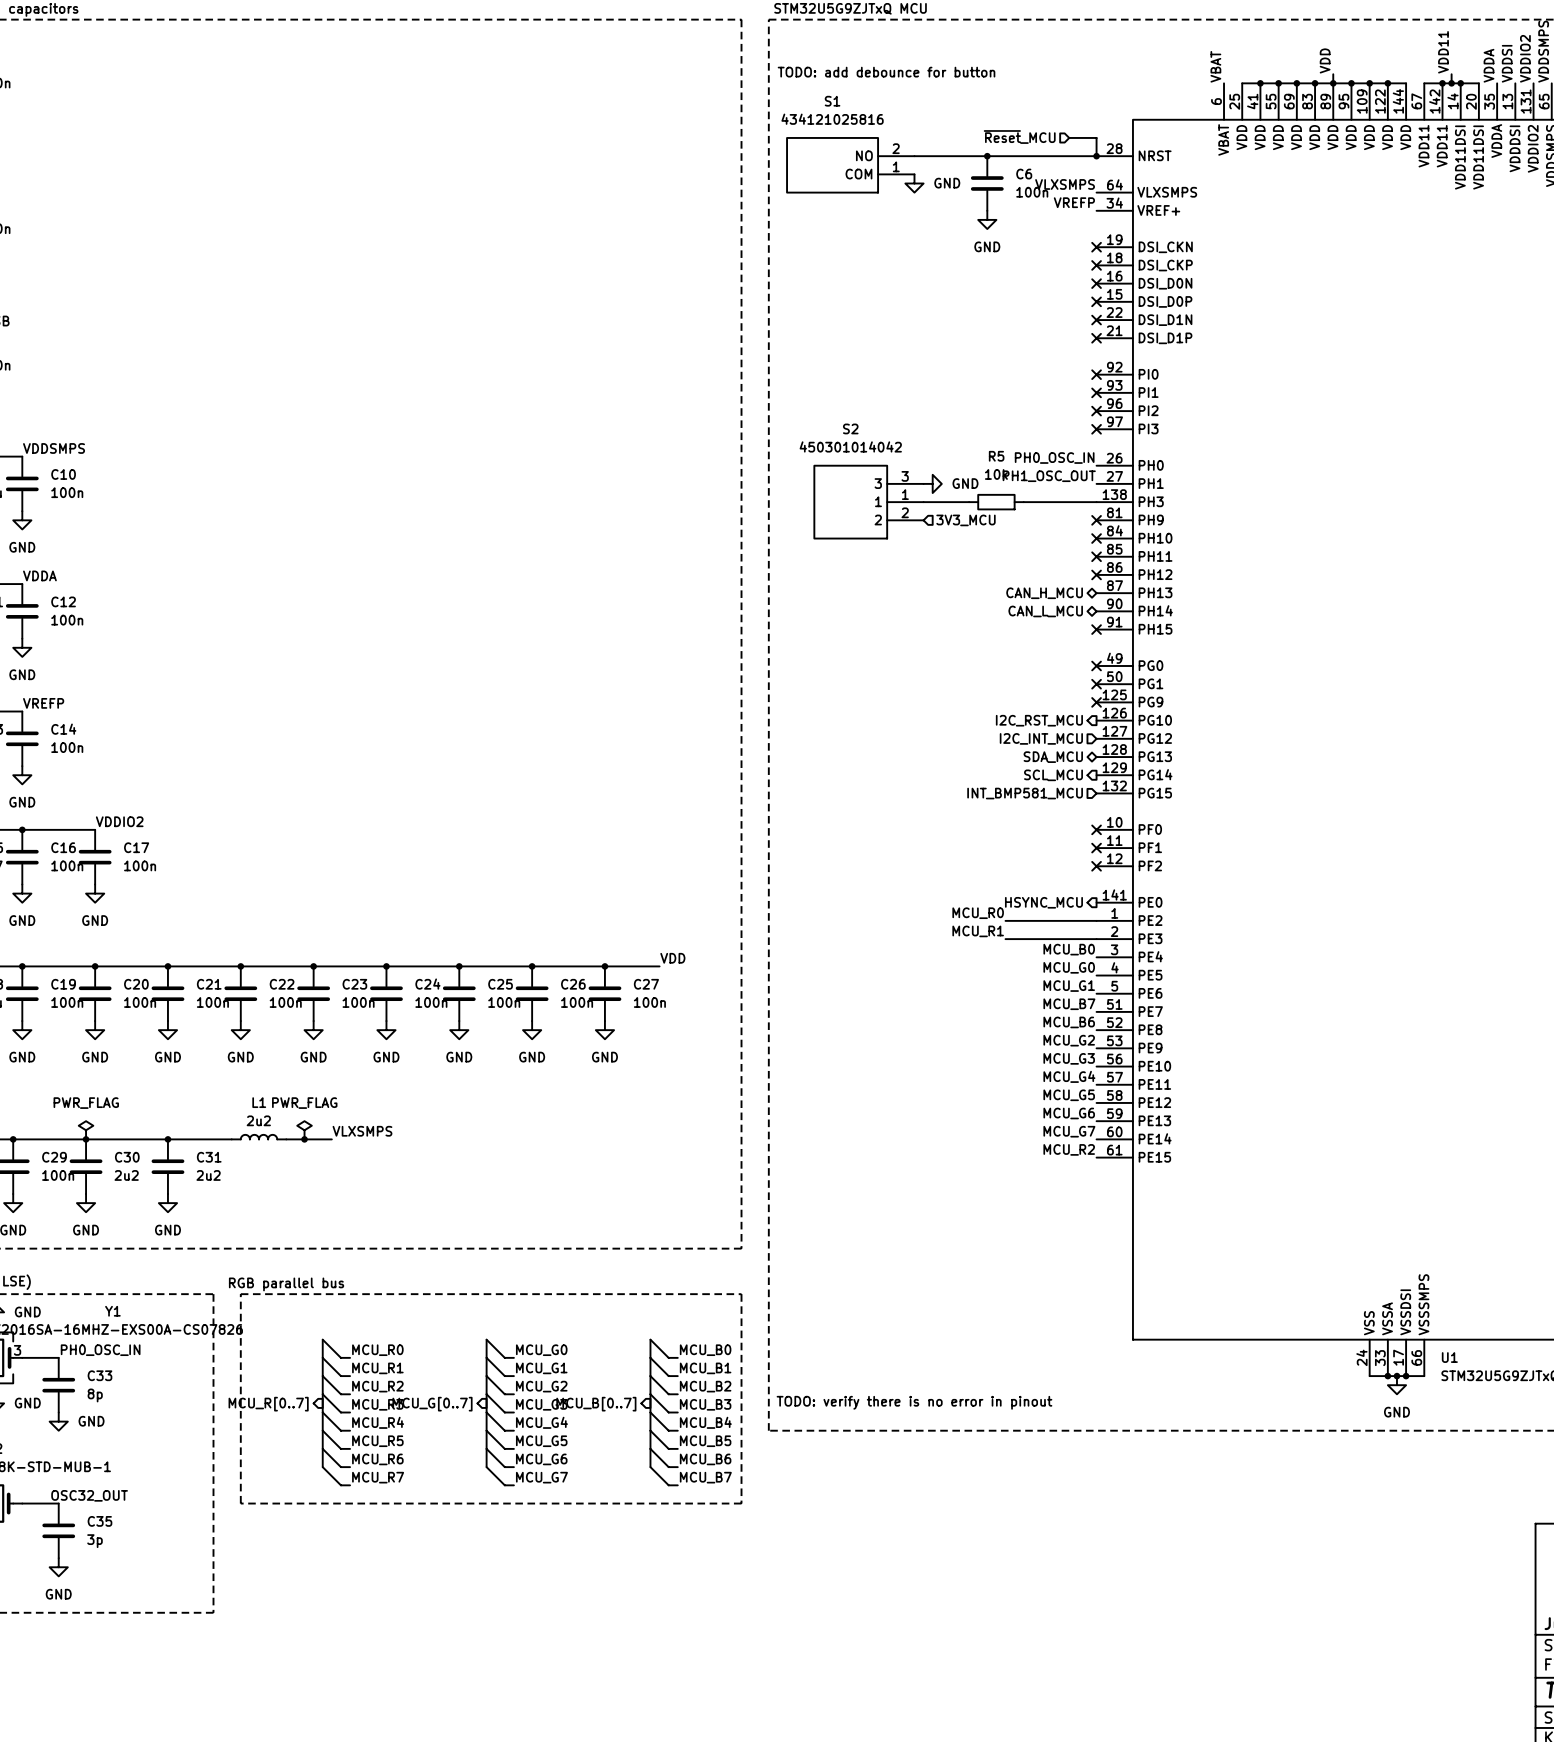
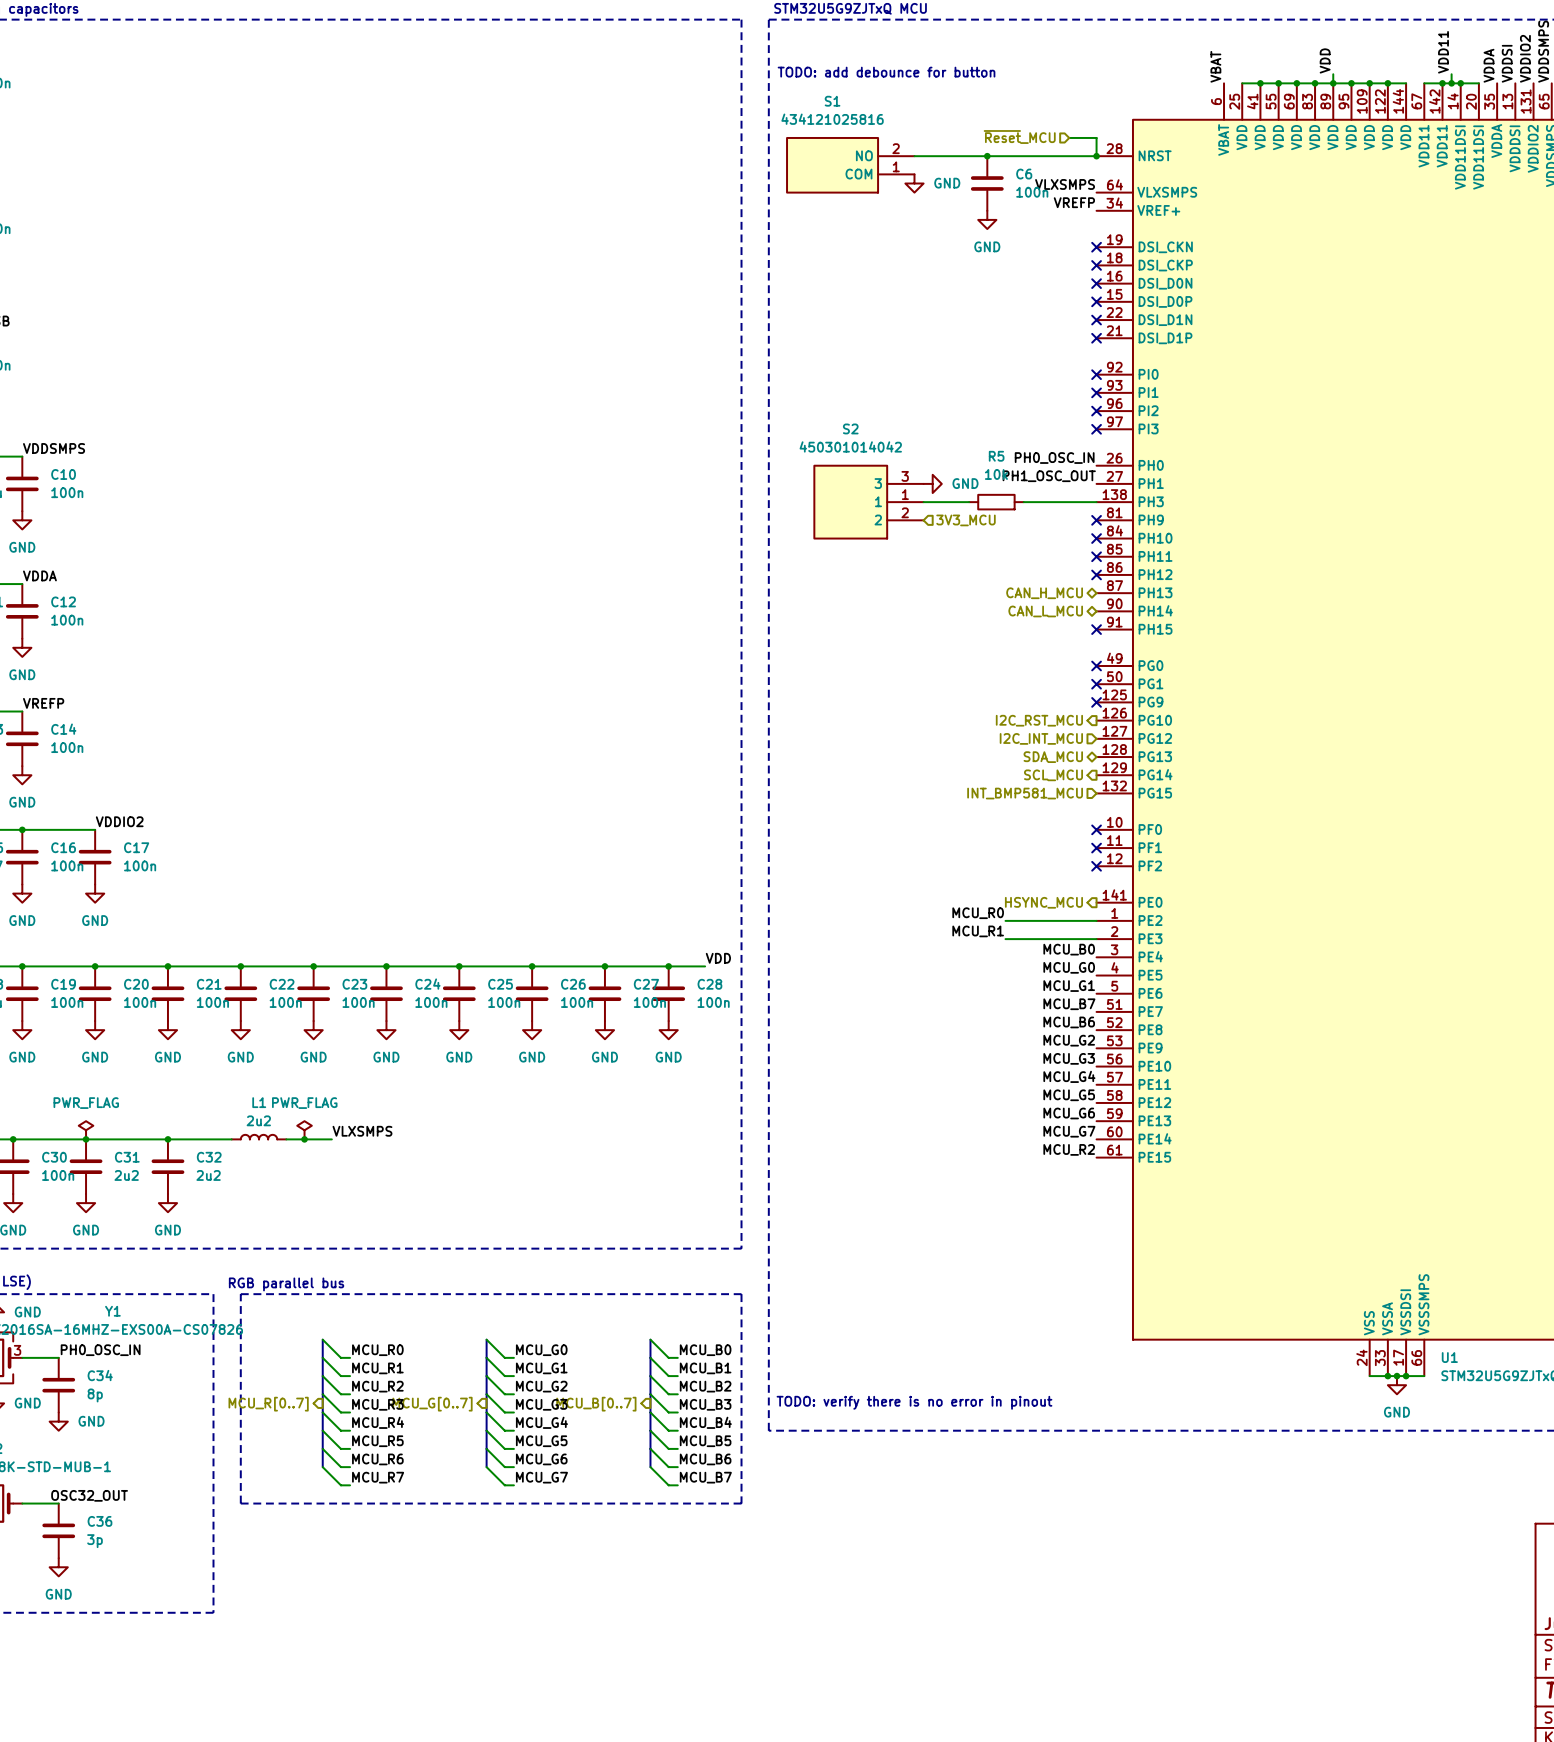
label position: VDD (672, 958) -> VDD (718, 958)
wire: none -> (659, 966) (705, 966)
junction: none -> (668, 966)
C28: none -> 100n (668, 993)
power symbol: none -> GND (668, 1030)
C29 name: C29 (54, 1157) -> C30 (54, 1157)
C30 name: C30 (127, 1157) -> C31 (127, 1157)
C31 name: C31 (209, 1157) -> C32 (209, 1157)
C33 name: C33 (99, 1375) -> C34 (100, 1375)
C35 name: C35 (99, 1521) -> C36 (99, 1521)

